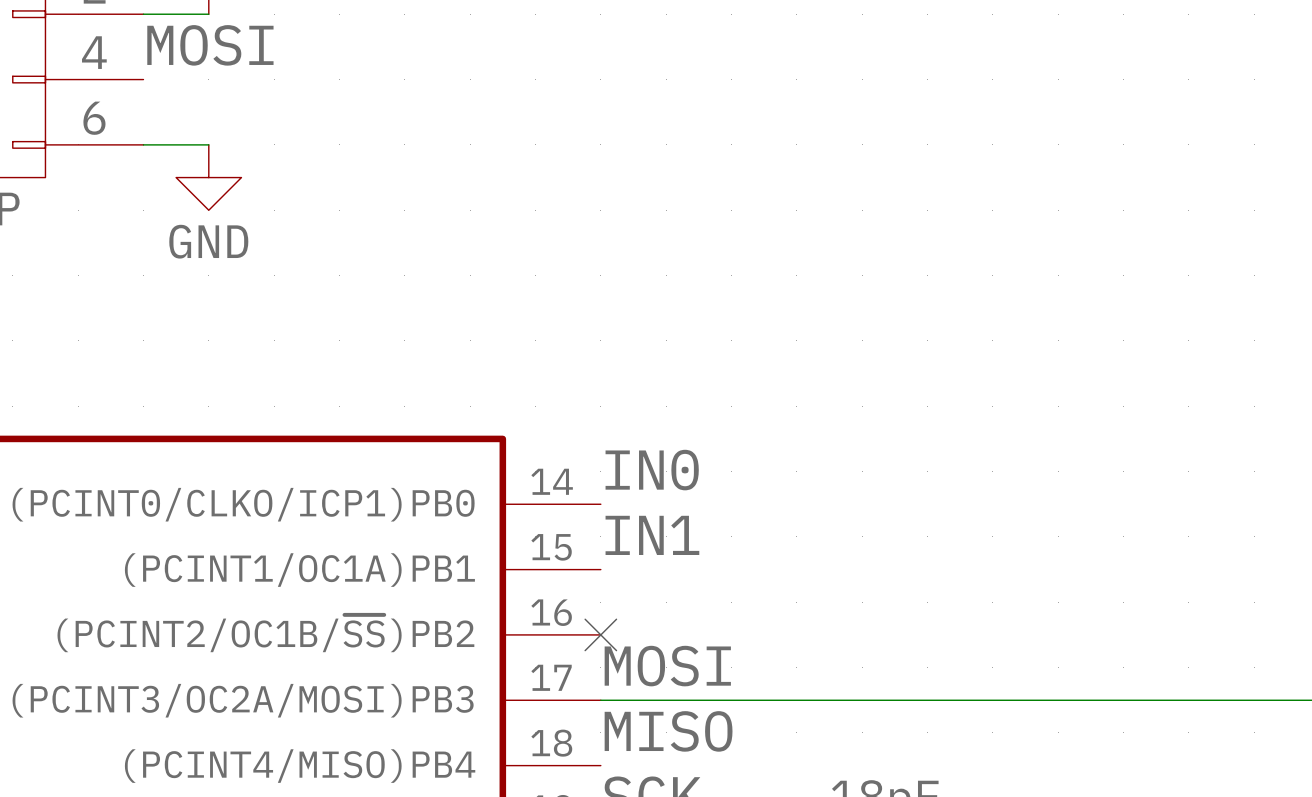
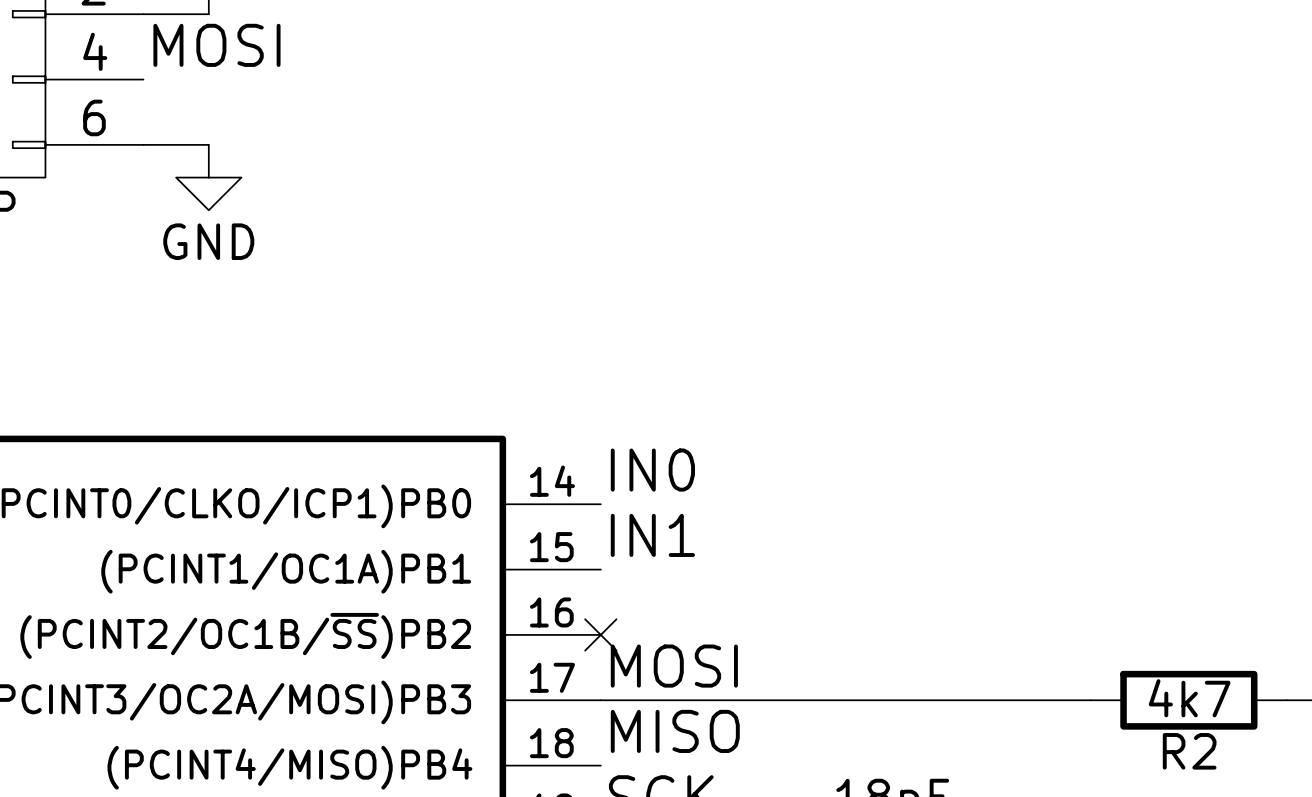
wire: (1090, 700) (1286, 700) -> none
R2: none -> 4k7 (1188, 700)

